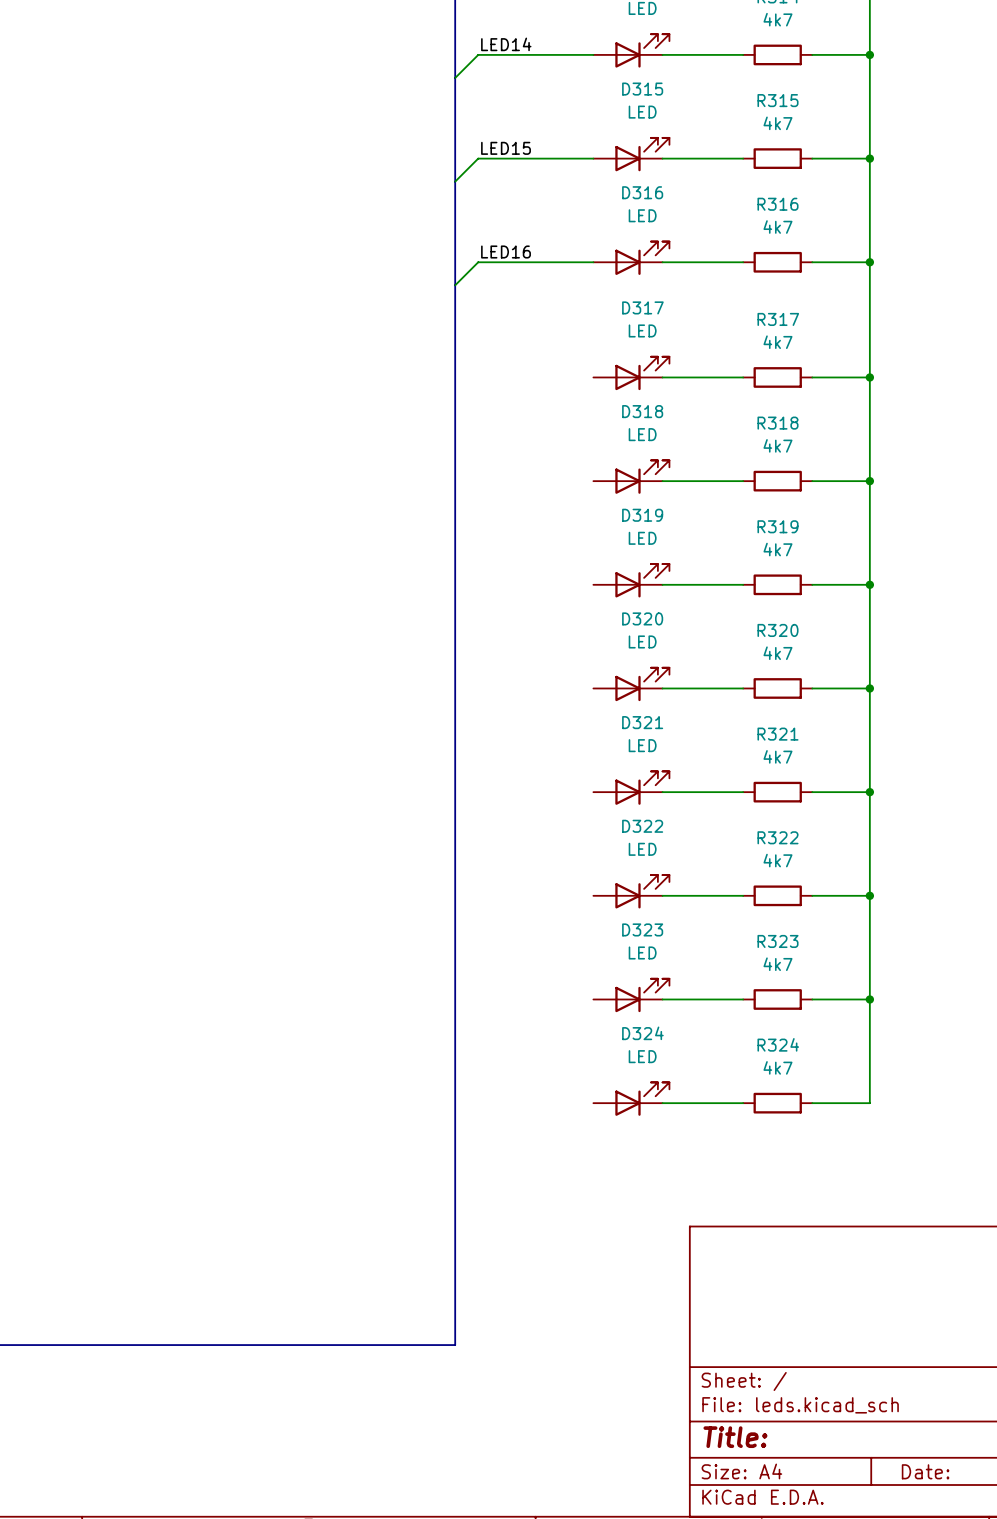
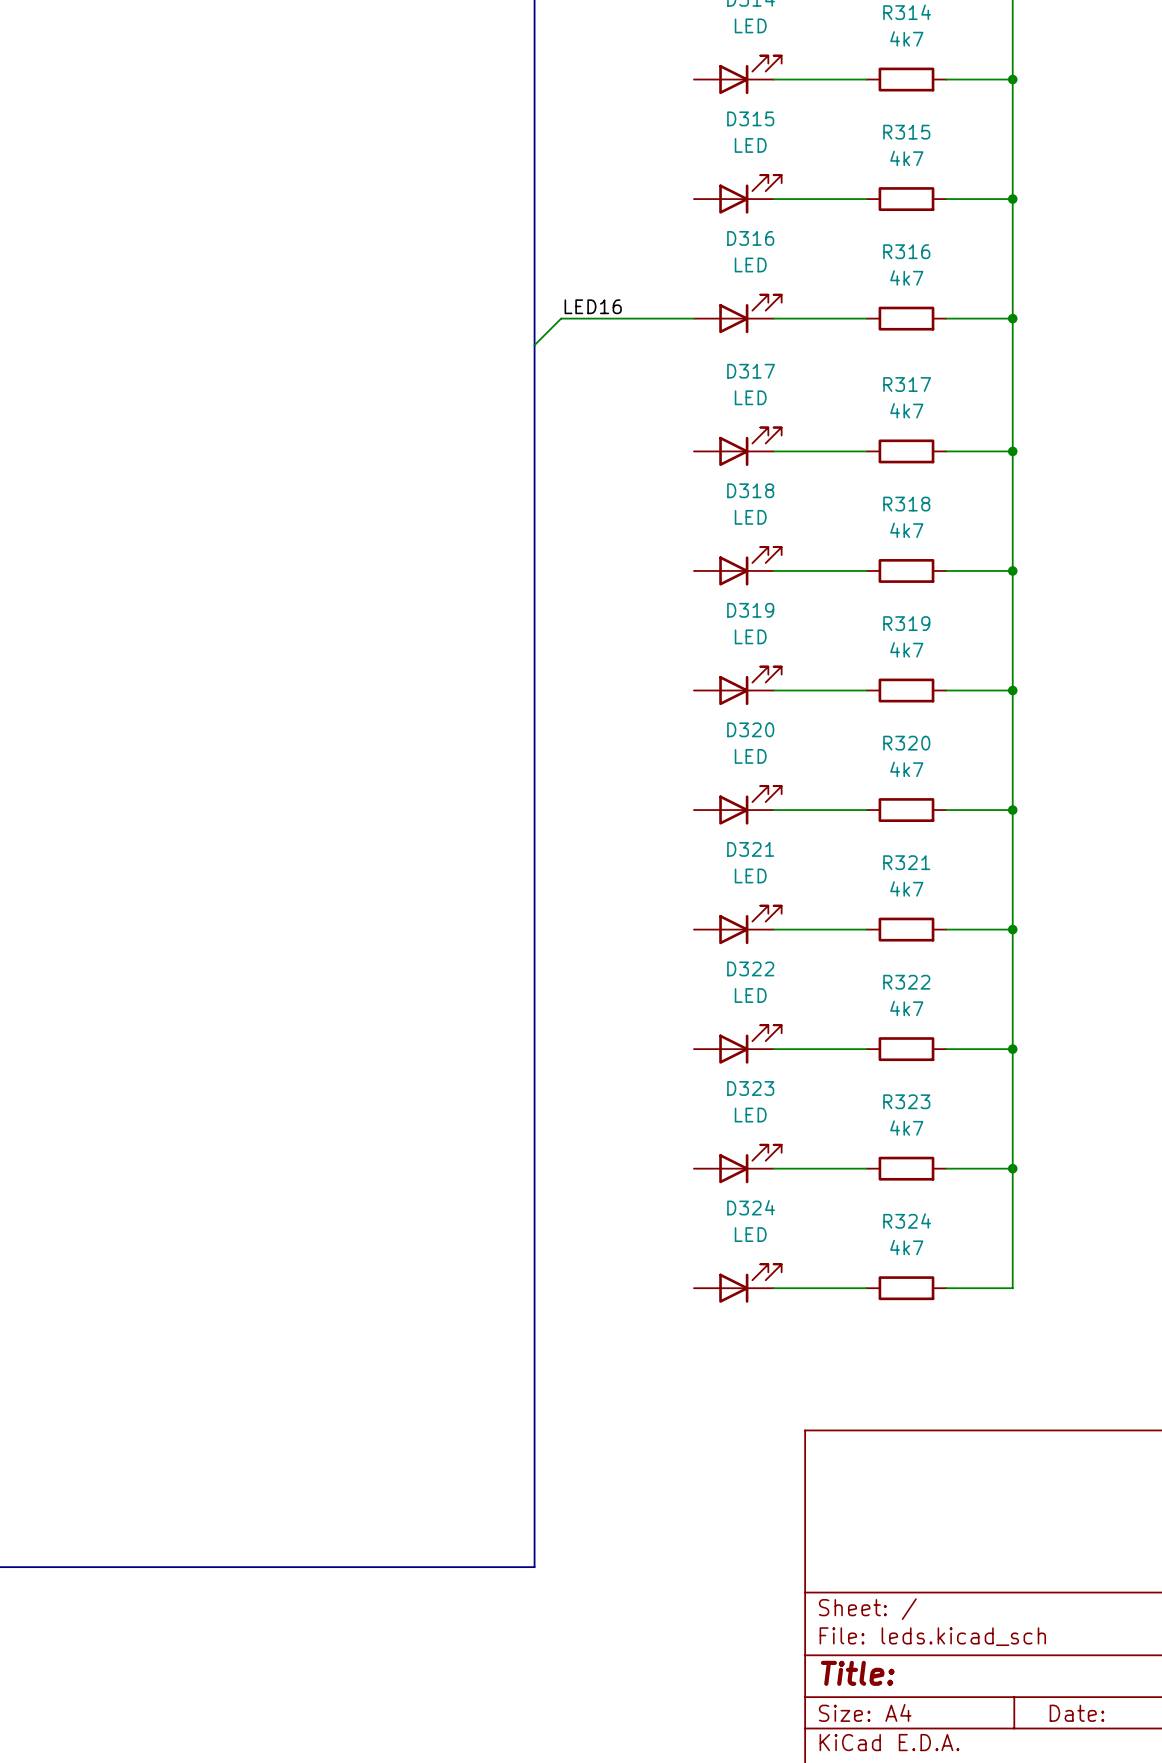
label: LED14 (506, 44) -> none
wire: (593, 54) (478, 54) (455, 77) -> none
label: LED15 (506, 148) -> none
wire: (593, 158) (478, 158) (455, 181) -> none

